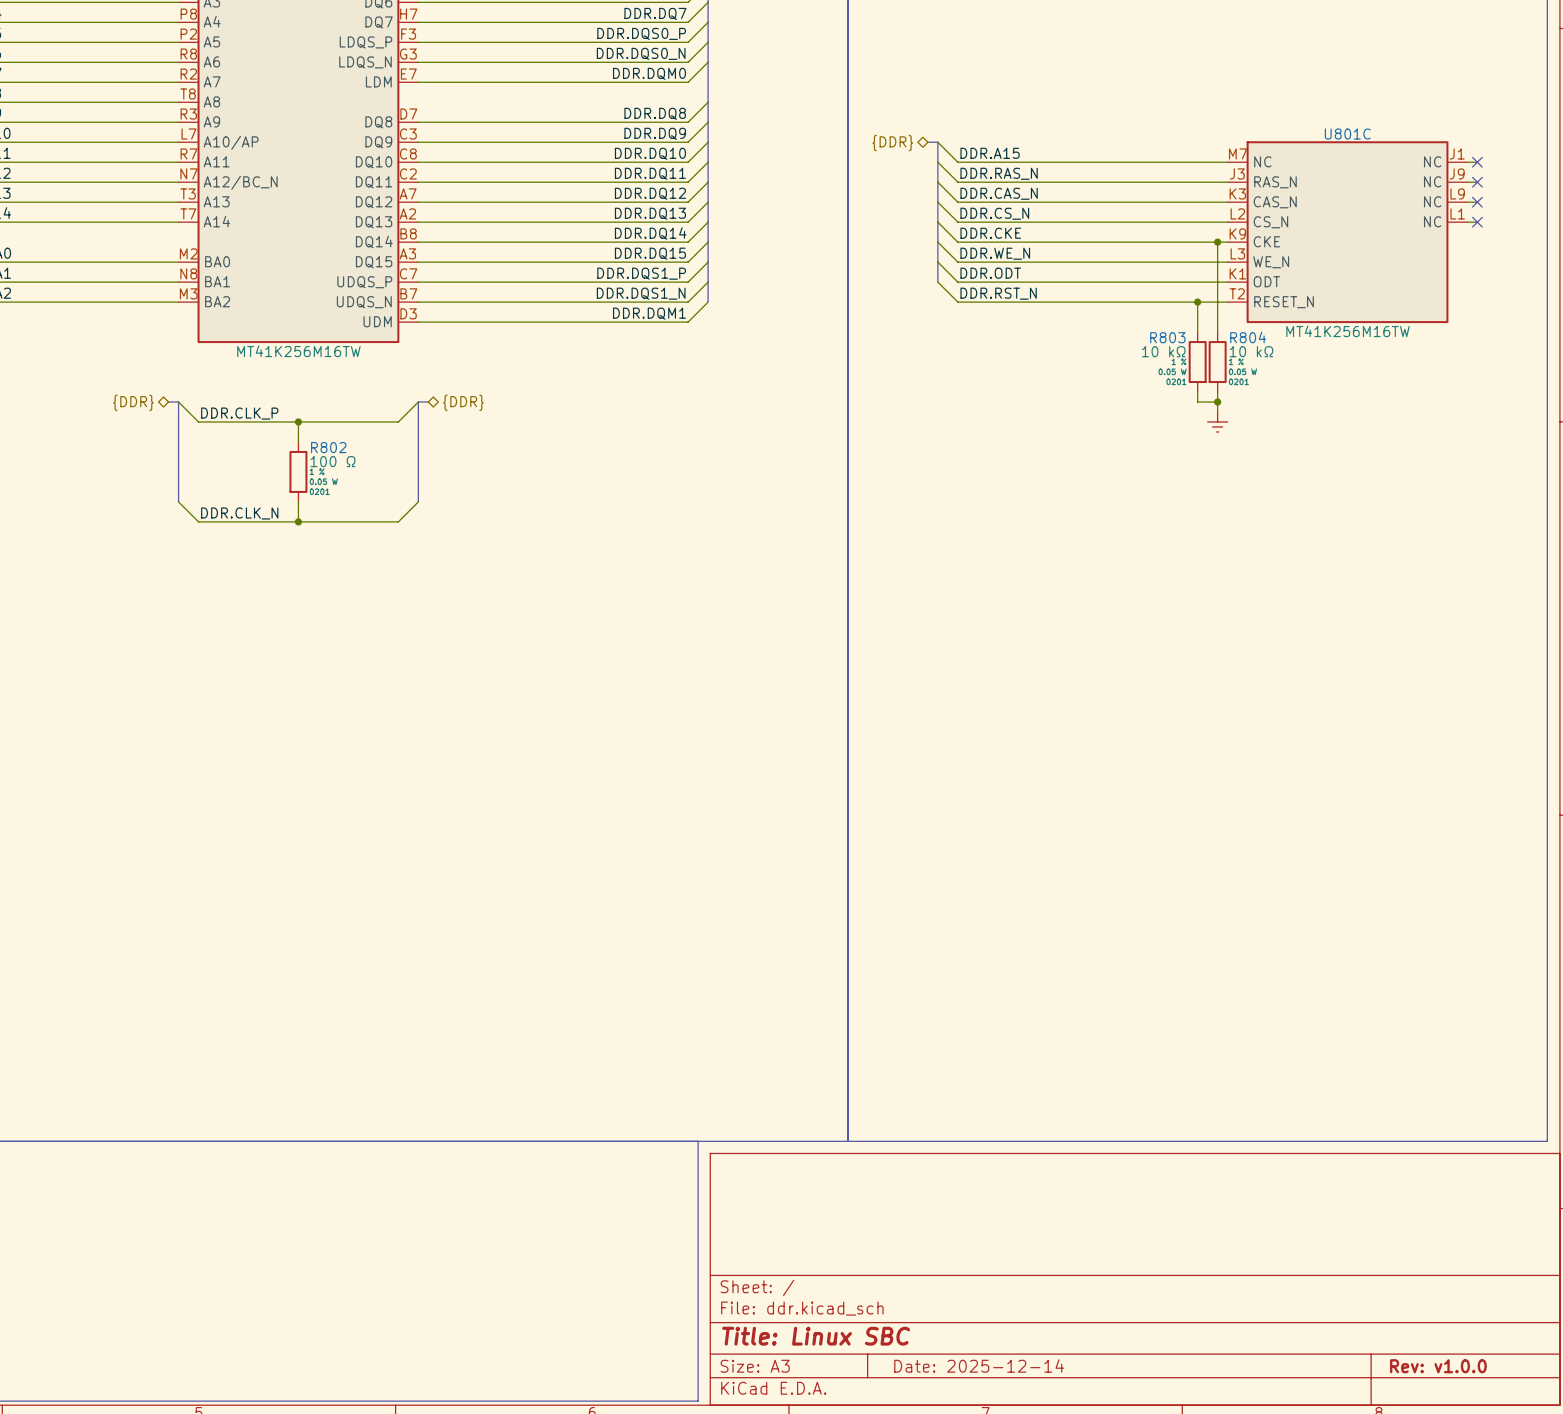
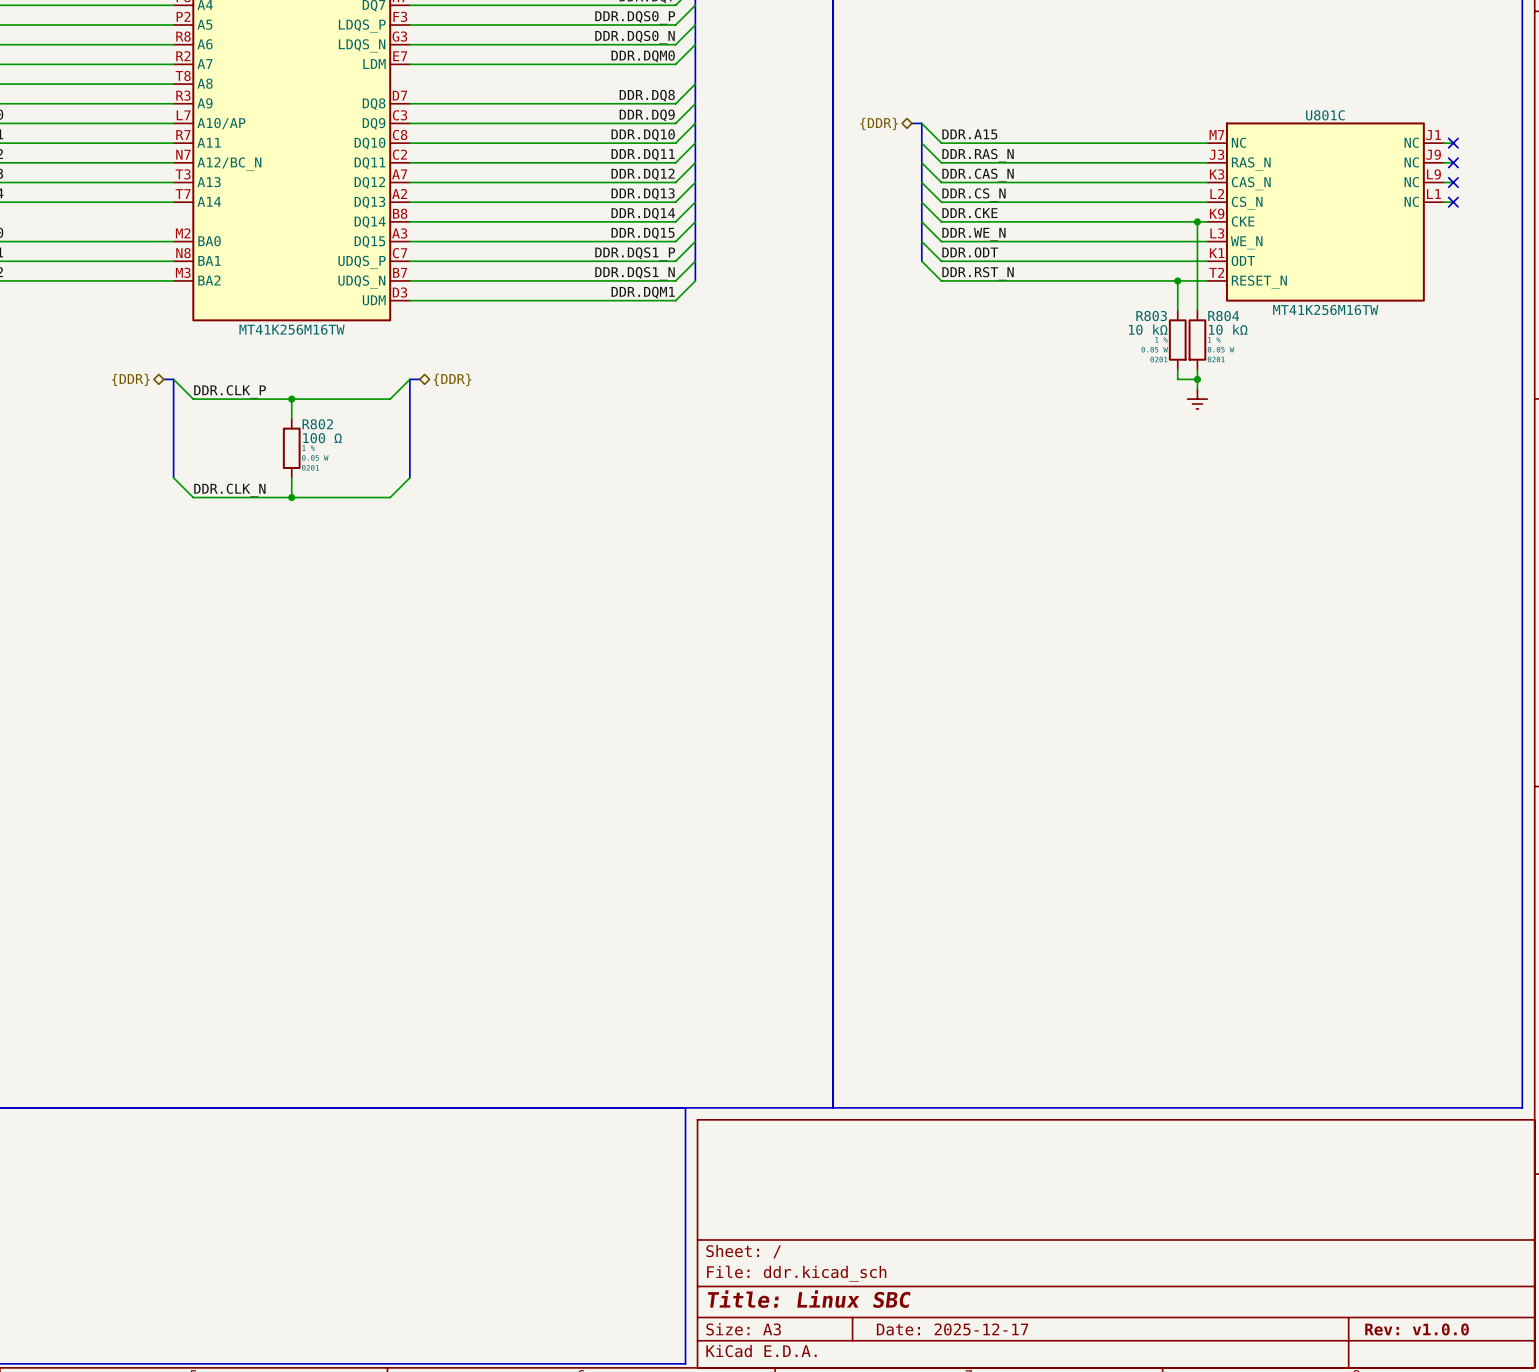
title block: Date: 2025-12-14 (979, 1365) -> Date: 2025-12-17 (952, 1329)

